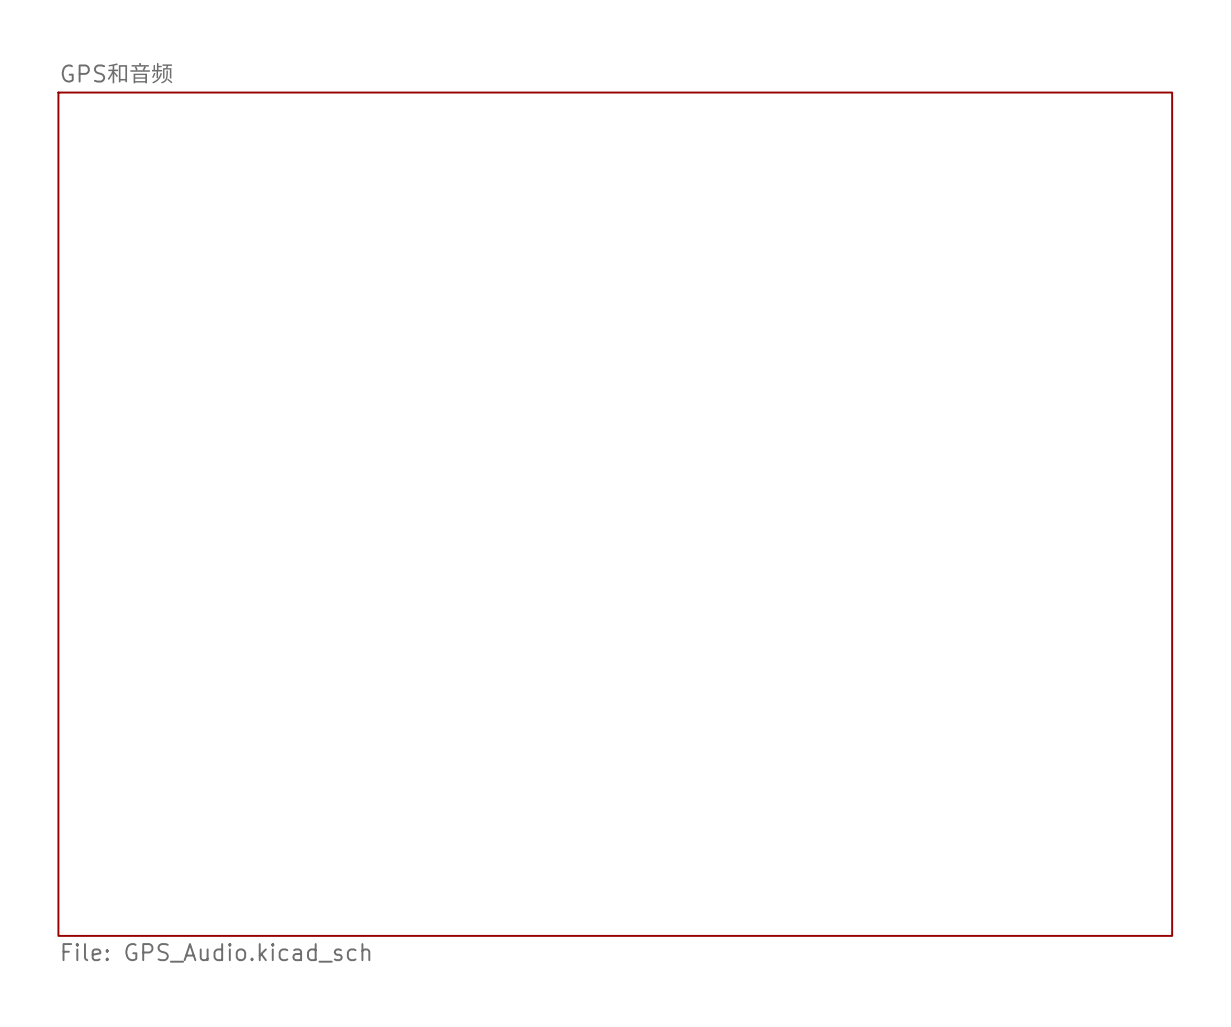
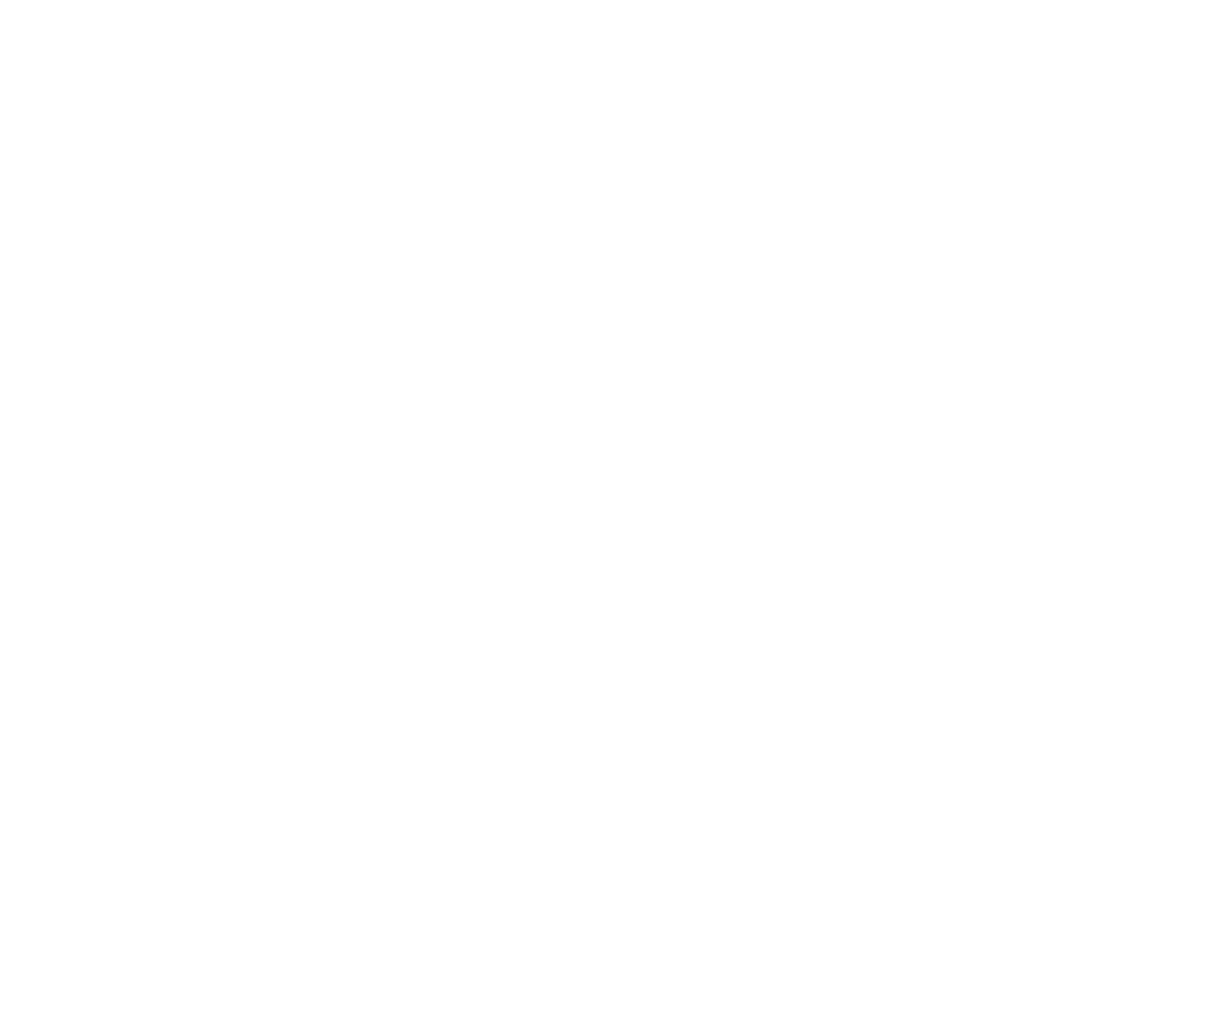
sheet GPS和音频: File: GPS_Audio.kicad_sch (615, 514) -> none

